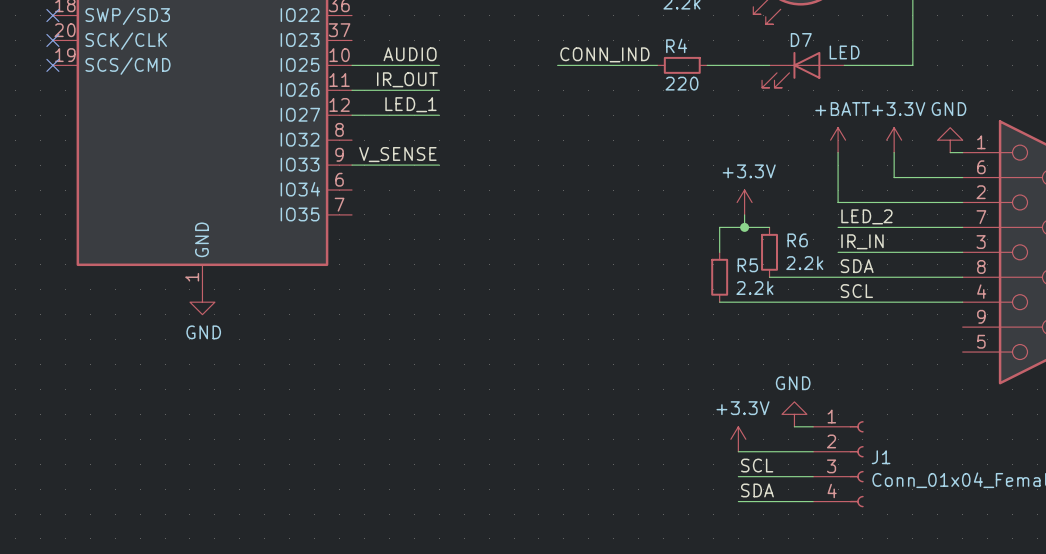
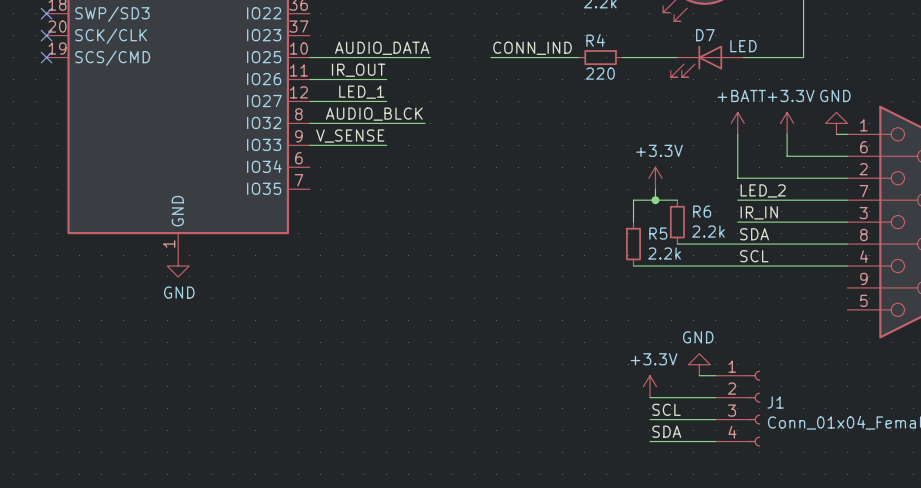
label: AUDIO (410, 54) -> AUDIO_DATA (382, 48)
wire: none -> (386, 57) (430, 57)
label: none -> AUDIO_BLCK (374, 114)
wire: none -> (309, 123) (425, 123)

